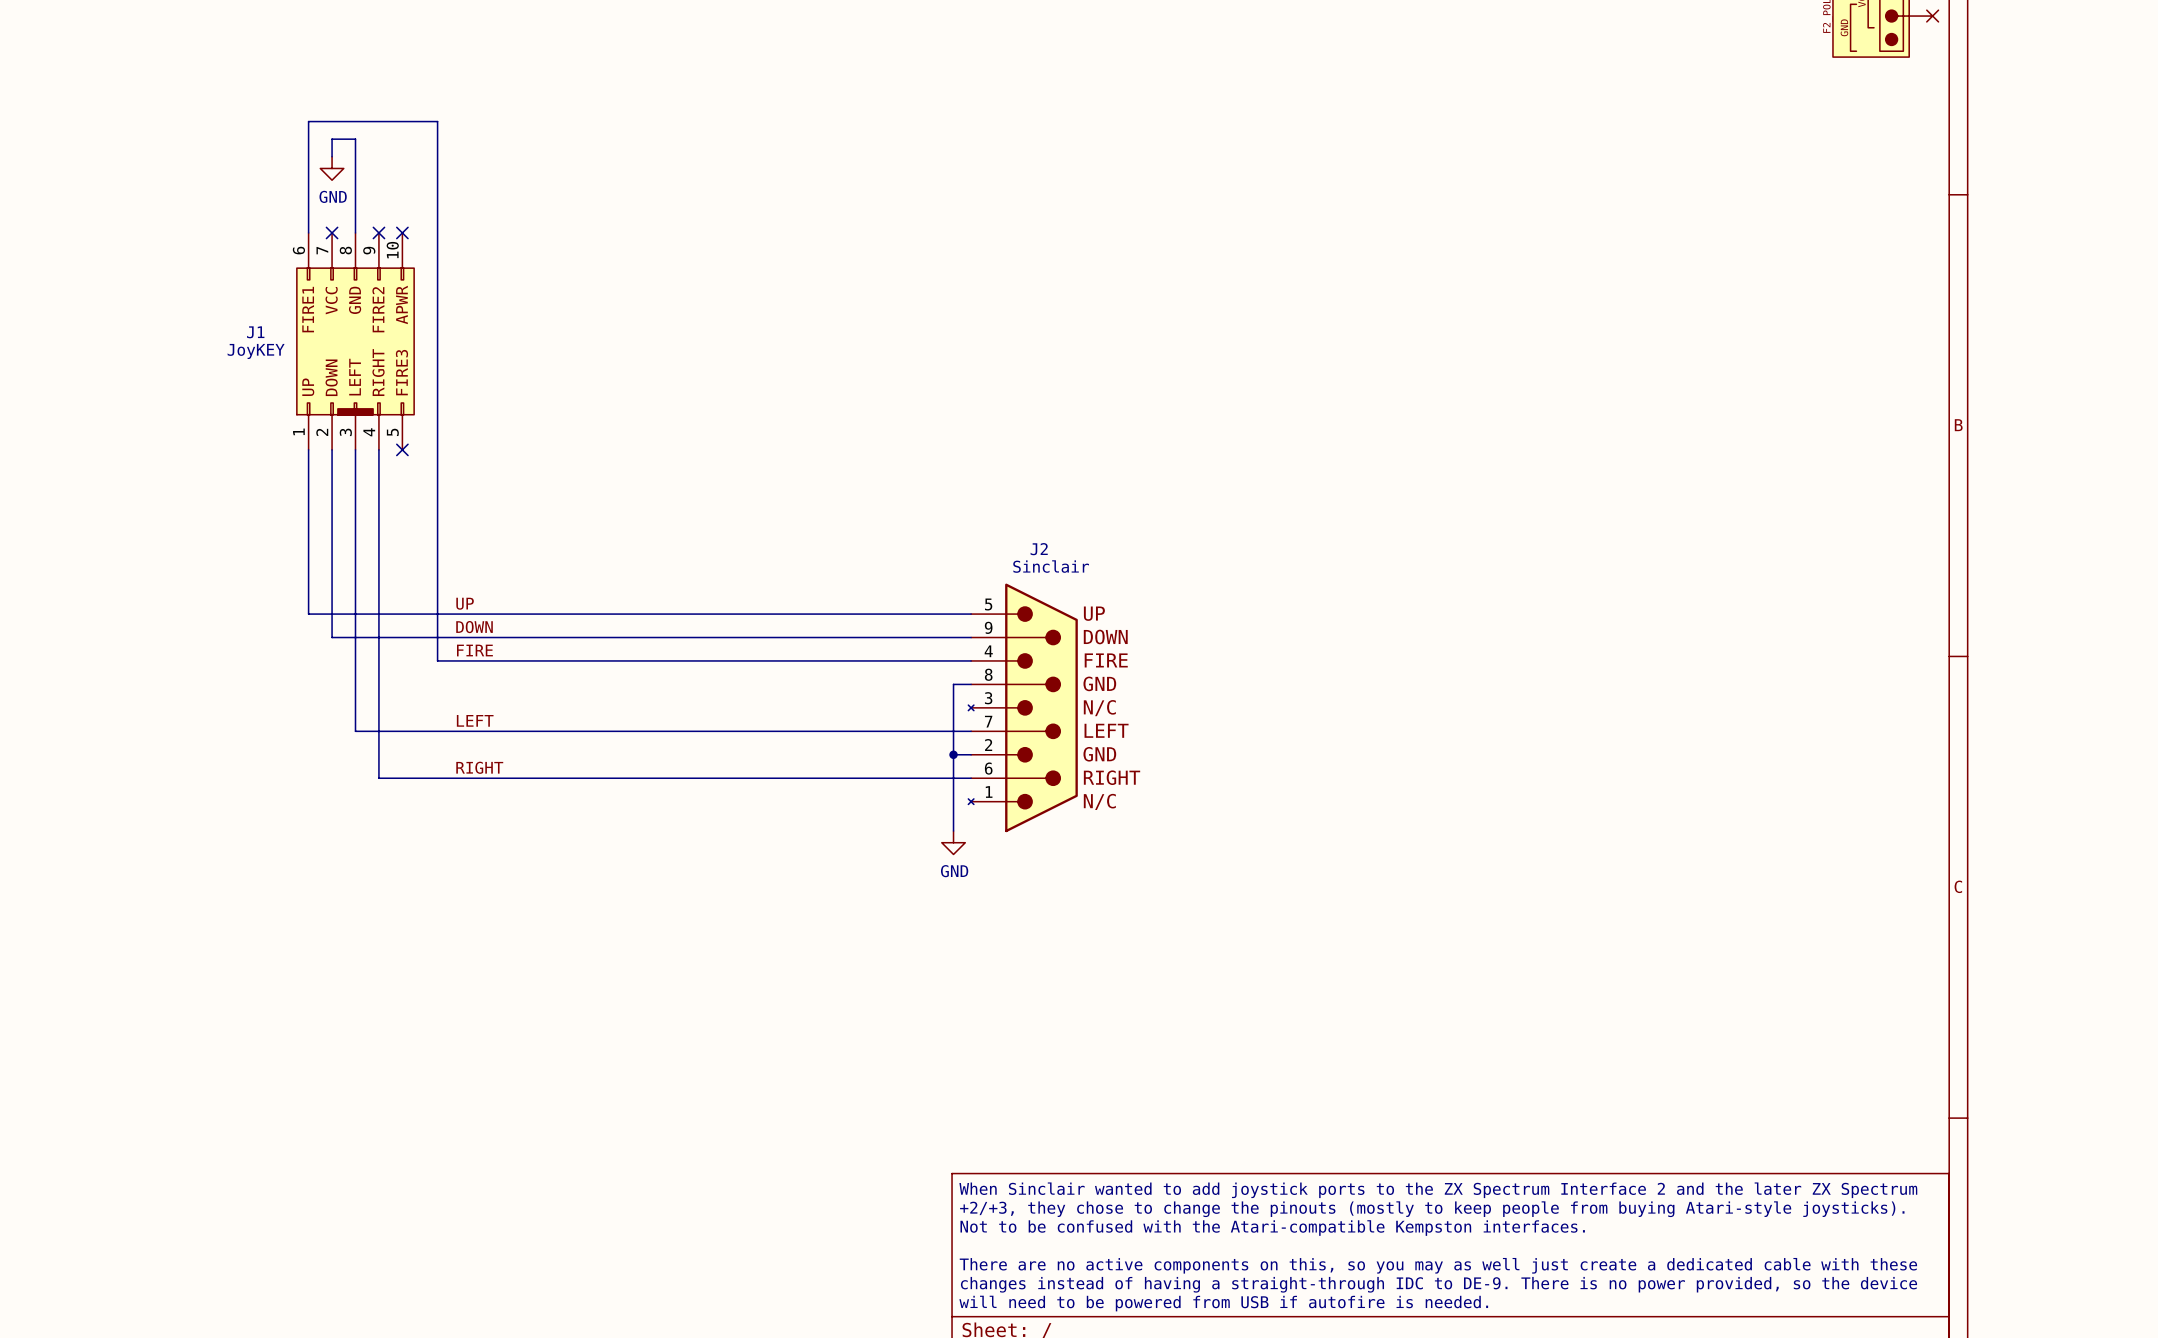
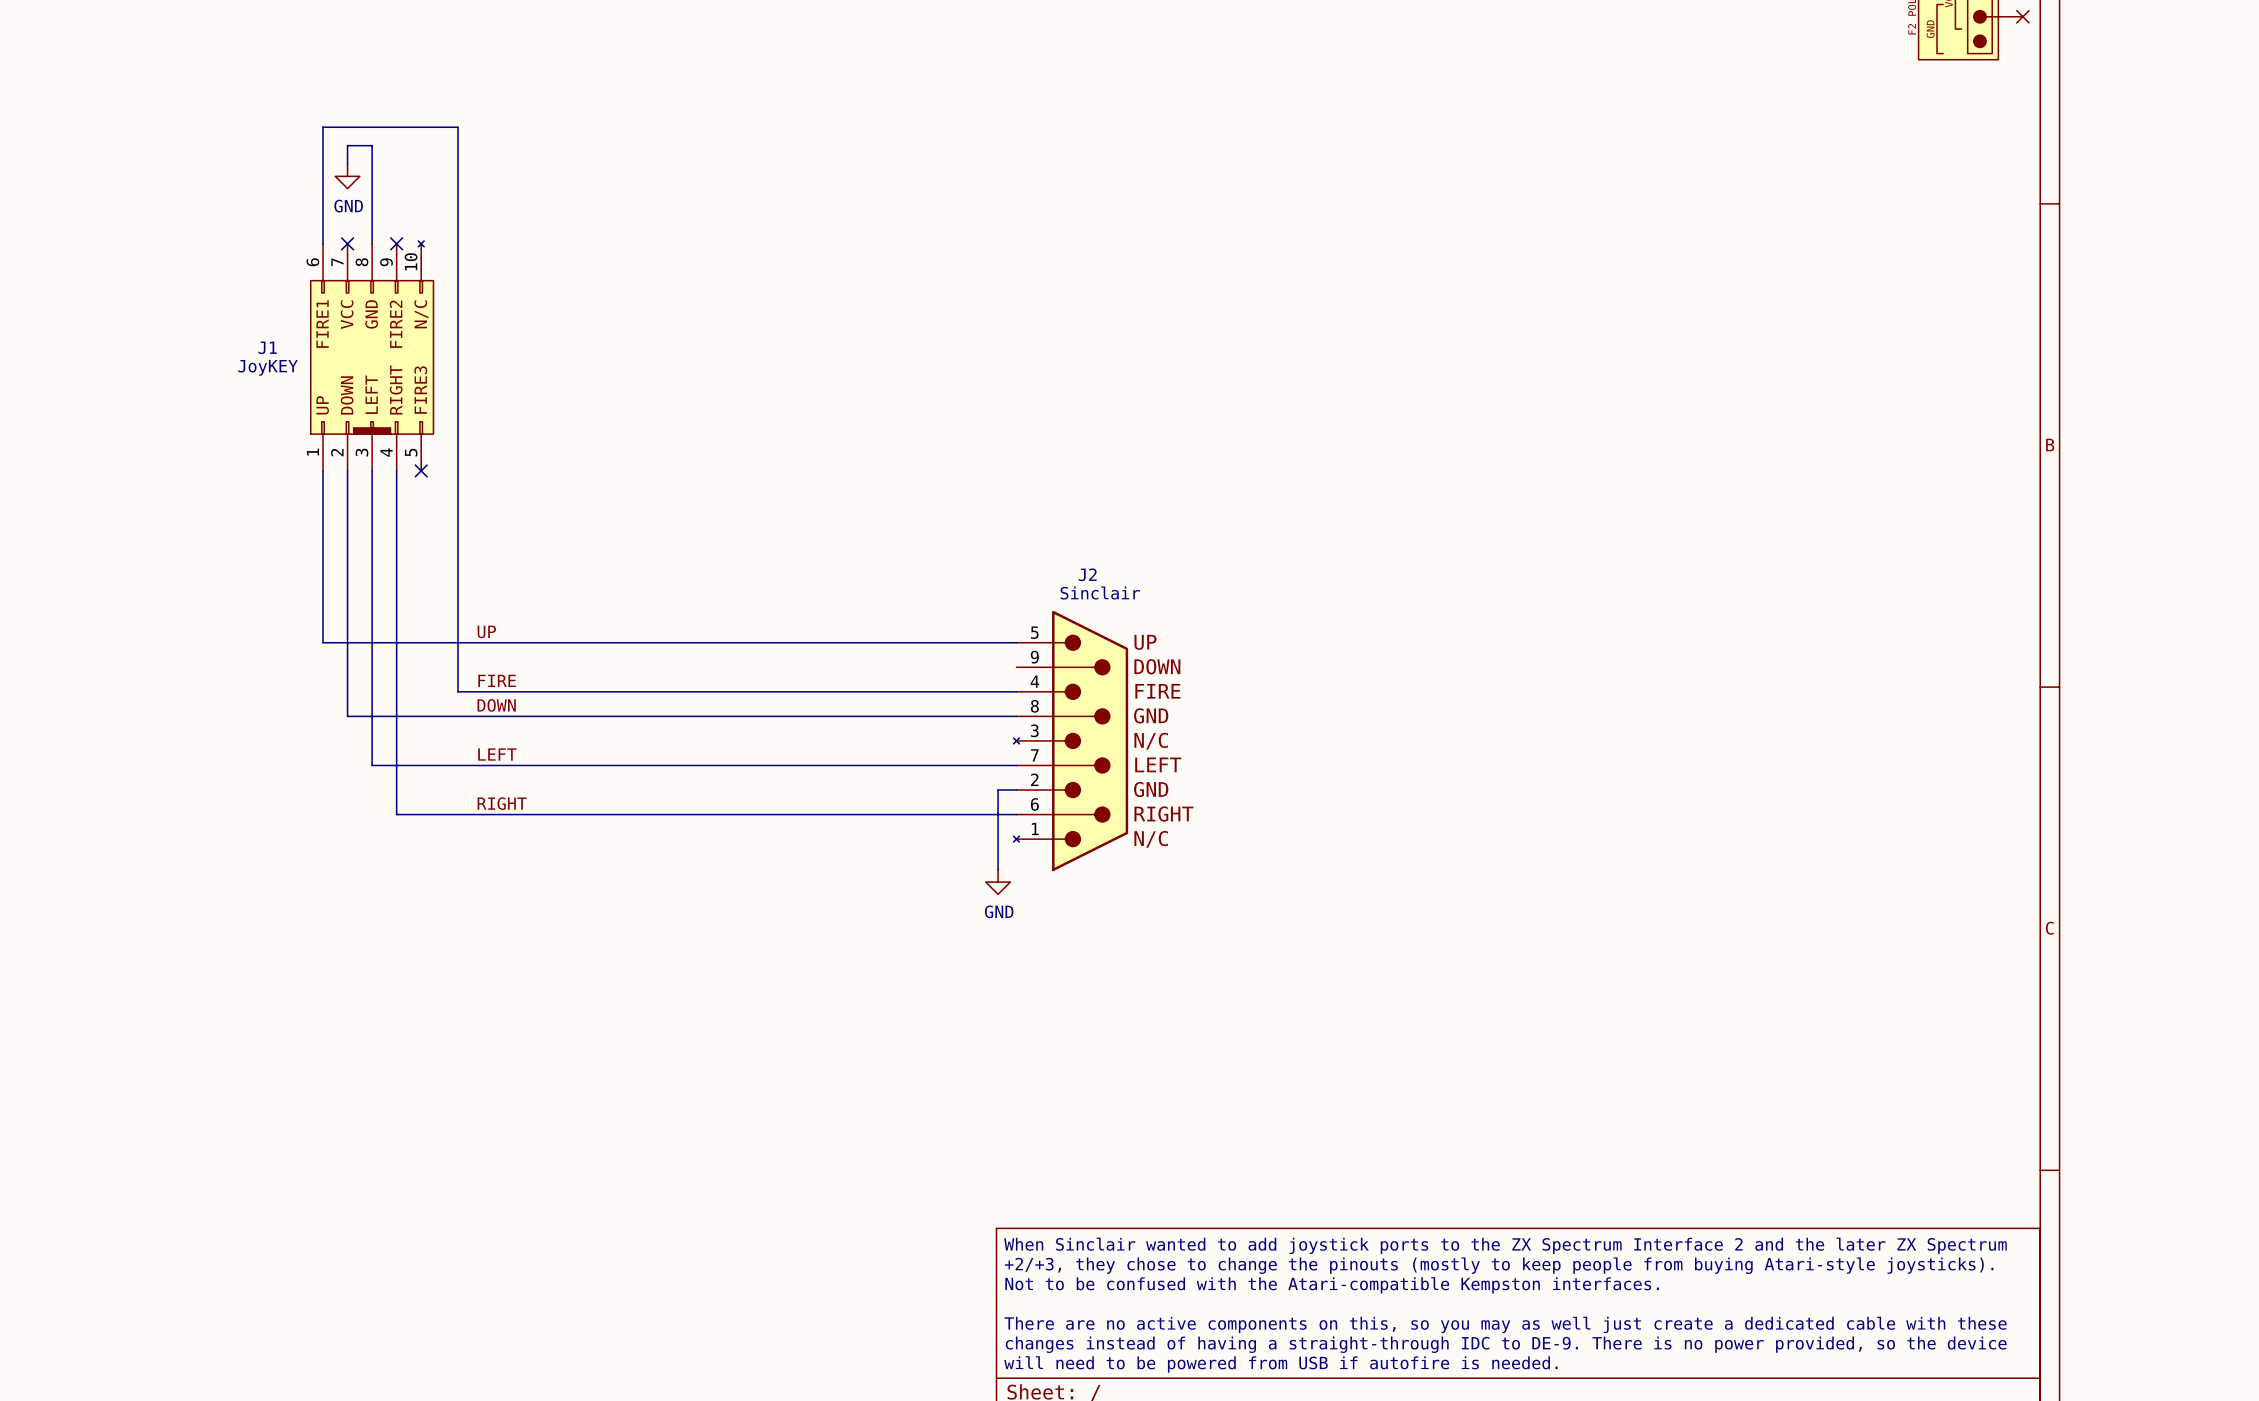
J1 symbol: [296, 232, 415, 450] -> [310, 240, 434, 471]
no-connect mark: (402, 232) -> none
label position: DOWN (474, 627) -> DOWN (496, 705)
wire: (332, 637) (971, 637) -> (347, 667) (347, 716) (998, 716)
wire: (953, 684) (953, 754) -> none
junction: (953, 754) -> none

